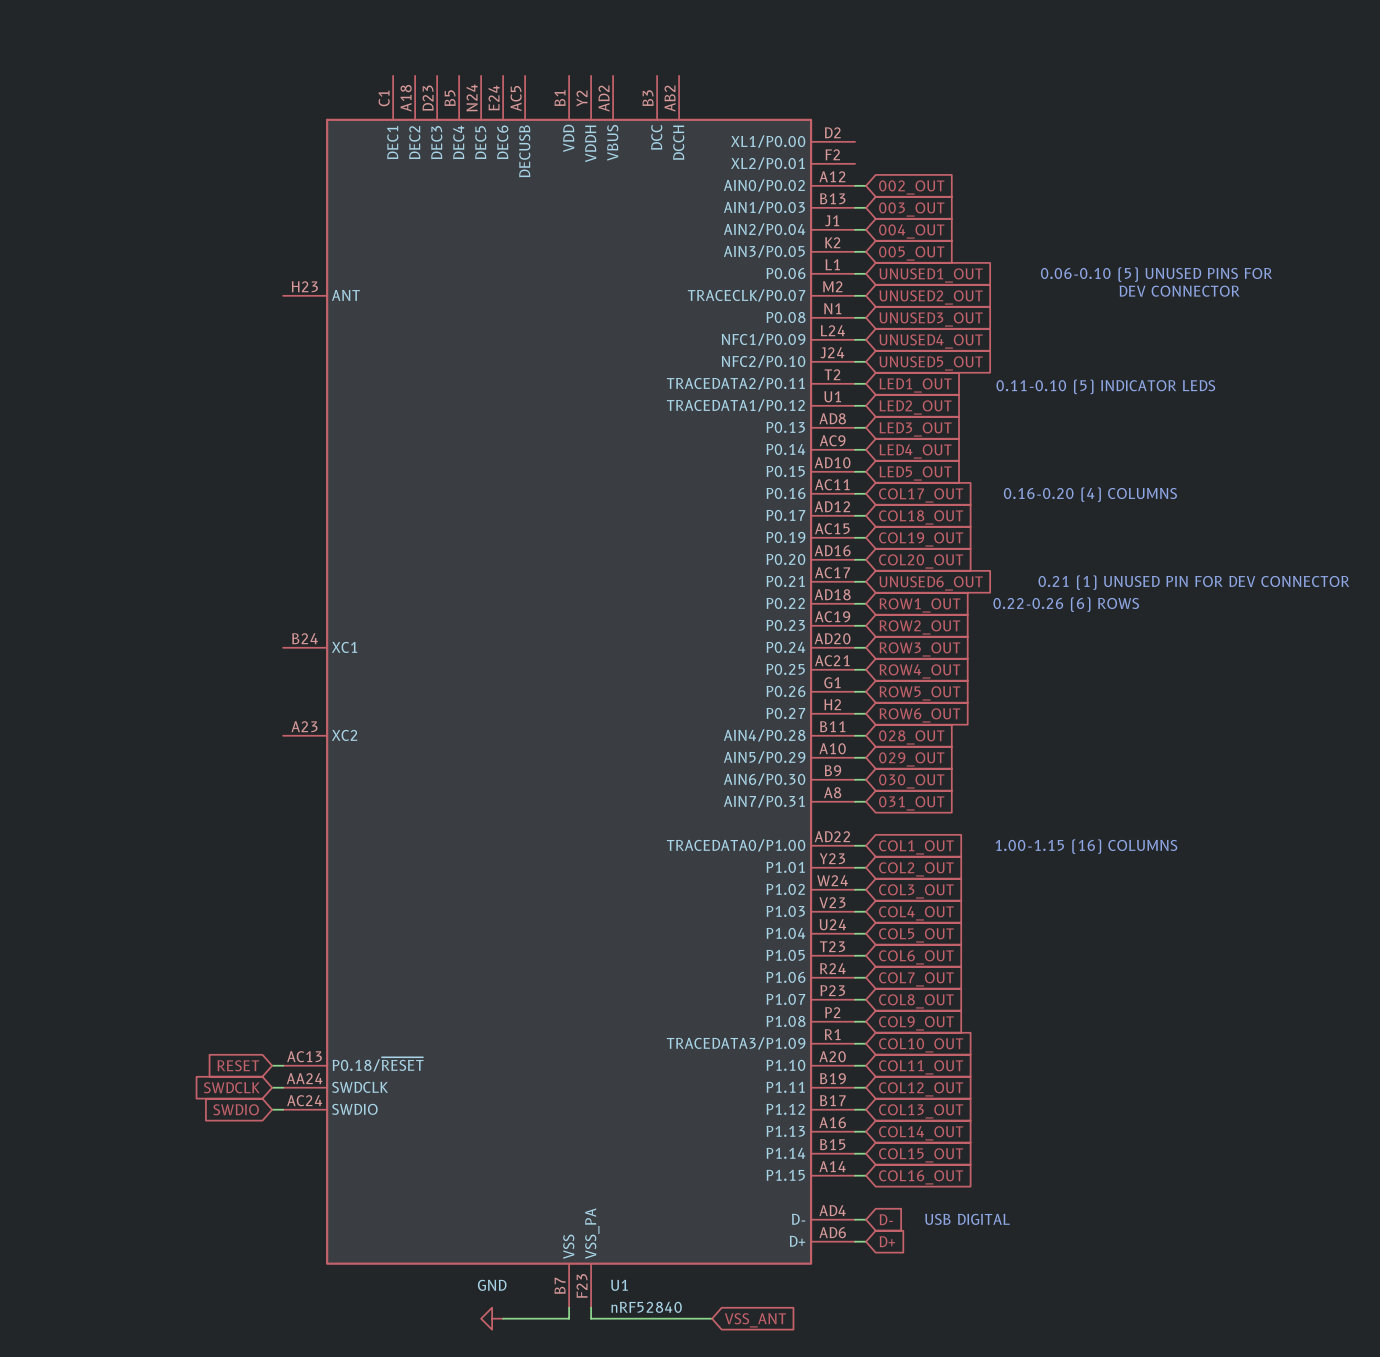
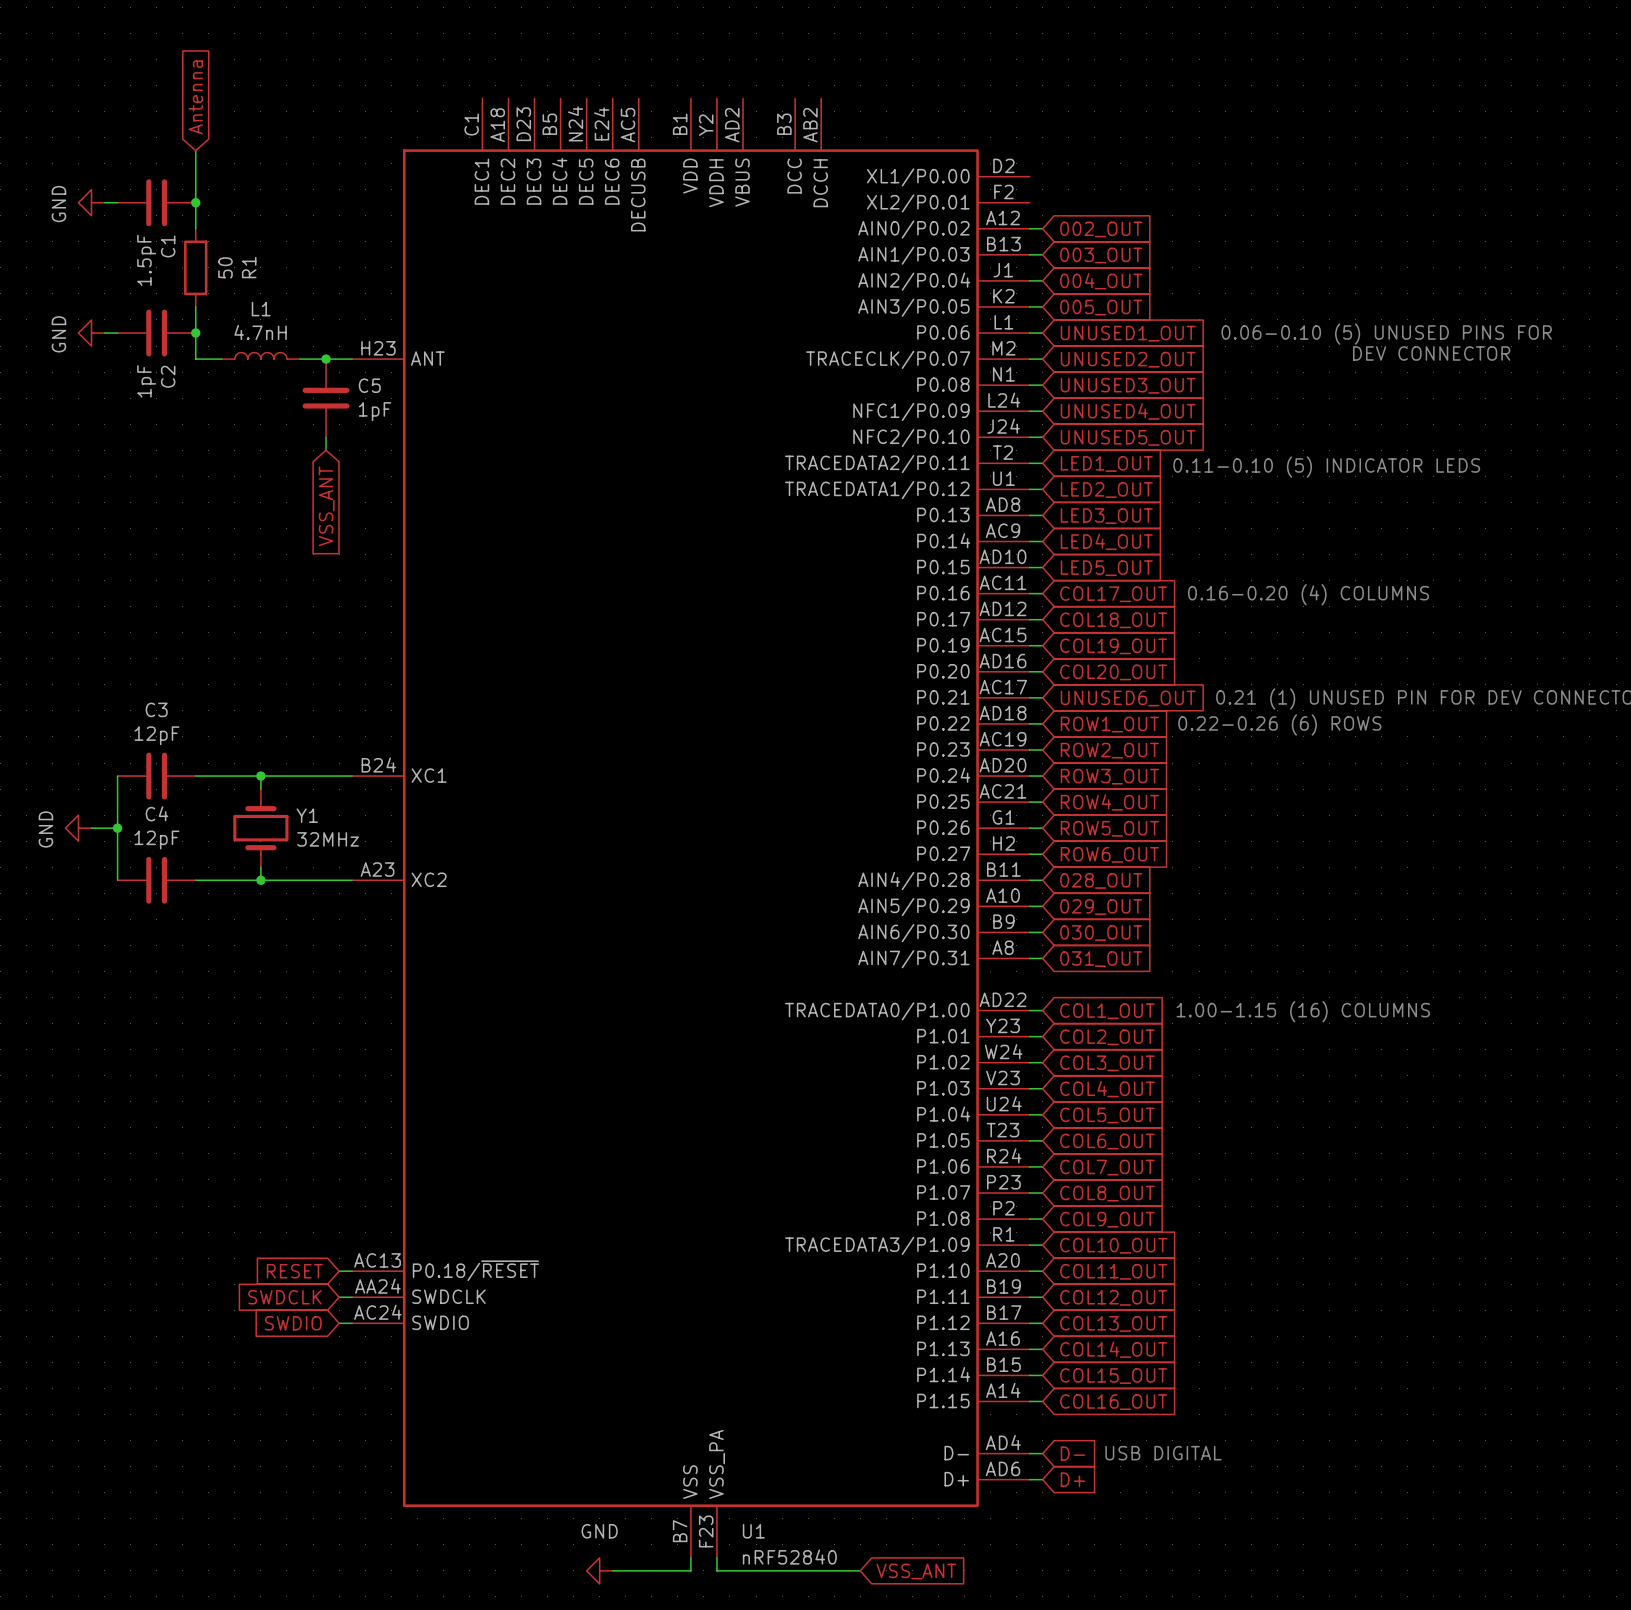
global label: none -> Antenna (195, 97)
wire: none -> (195, 150) (195, 228)
power symbol: none -> GND (91, 202)
wire: none -> (104, 202) (117, 202)
C1: none -> 1.5pF (156, 202)
junction: none -> (195, 202)
R1: none -> 50 (195, 267)
wire: none -> (195, 306) (195, 359) (221, 359)
power symbol: none -> GND (91, 333)
wire: none -> (104, 333) (117, 333)
C2: none -> 1pF (156, 333)
junction: none -> (195, 333)
L1: none -> 4.7nH (260, 355)
wire: none -> (299, 359) (352, 359)
junction: none -> (326, 359)
C5: none -> 1pF (326, 398)
wire: none -> (326, 437) (326, 450)
global label: none -> VSS_ANT (326, 506)
wire: none -> (117, 776) (117, 880)
C3: none -> 12pF (156, 776)
wire: none -> (195, 776) (352, 776)
wire: none -> (260, 776) (260, 789)
junction: none -> (260, 776)
power symbol: none -> GND (78, 828)
wire: none -> (91, 828) (117, 828)
junction: none -> (117, 828)
Y1: none -> 32MHz (260, 828)
wire: none -> (260, 867) (260, 880)
C4: none -> 12pF (156, 880)
wire: none -> (195, 880) (352, 880)
junction: none -> (260, 880)

